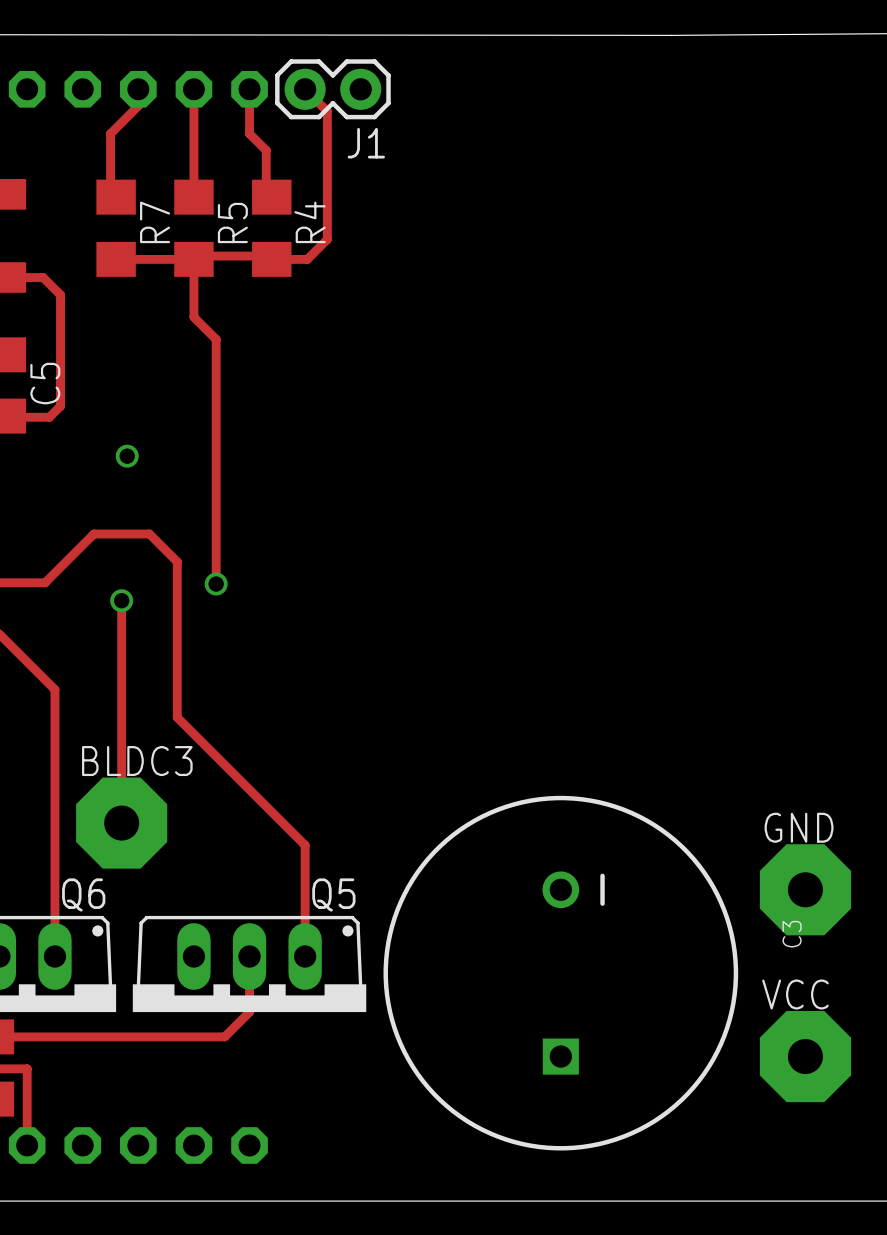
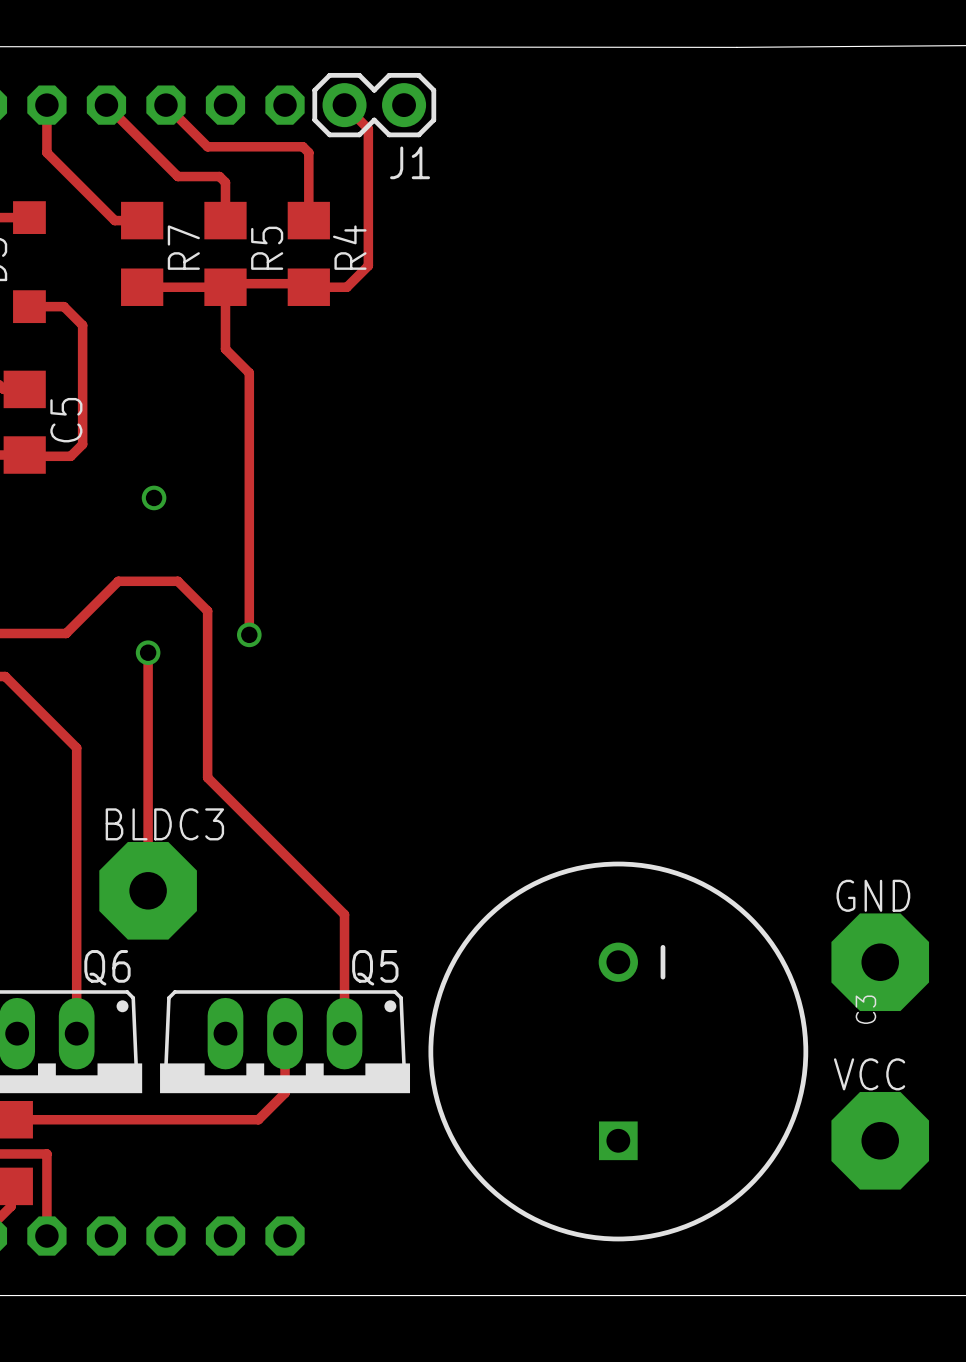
track: (138, 89) (138, 105) (110, 133) (110, 191) (116, 197) -> (46, 105) (46, 152) (114, 220) (142, 220)
track: (193, 89) (193, 161) -> (106, 105) (177, 176) (219, 176) (225, 182)
track: (249, 89) (249, 133) (266, 150) (266, 191) (271, 197) -> (165, 105) (207, 146) (302, 146) (308, 152) (308, 220)

